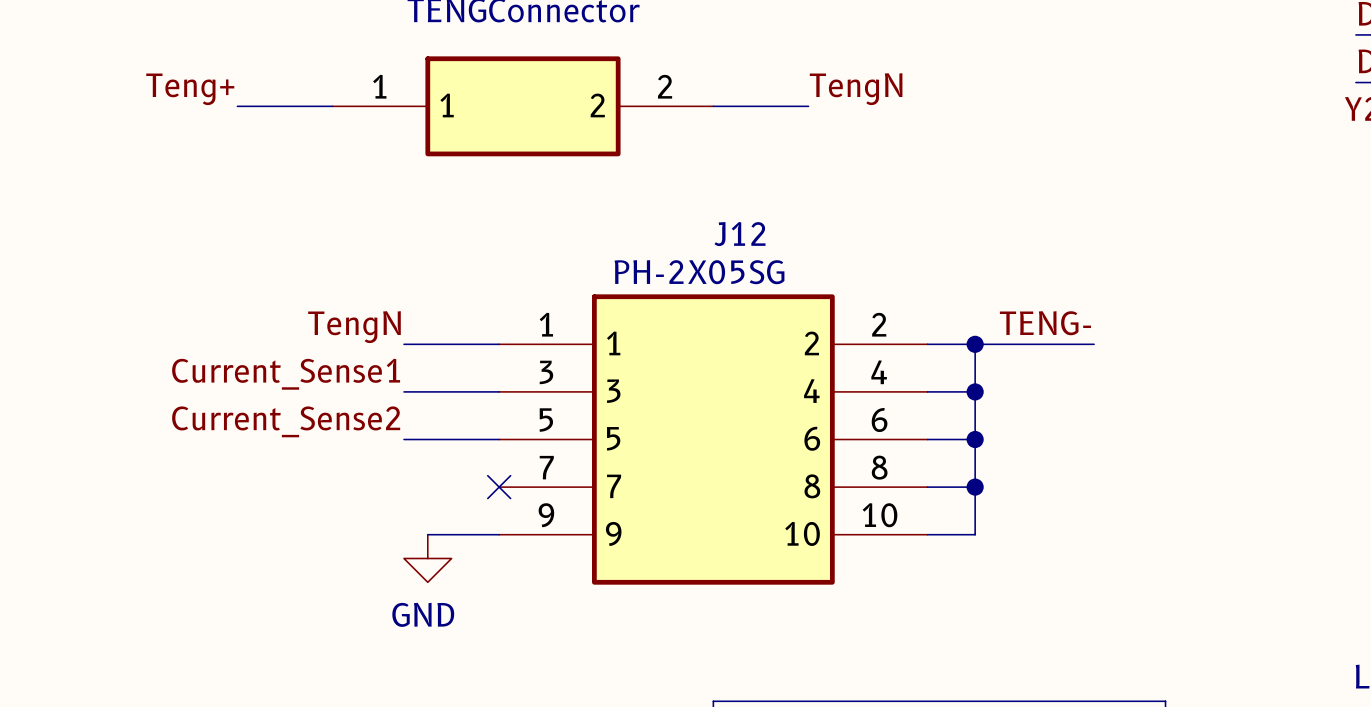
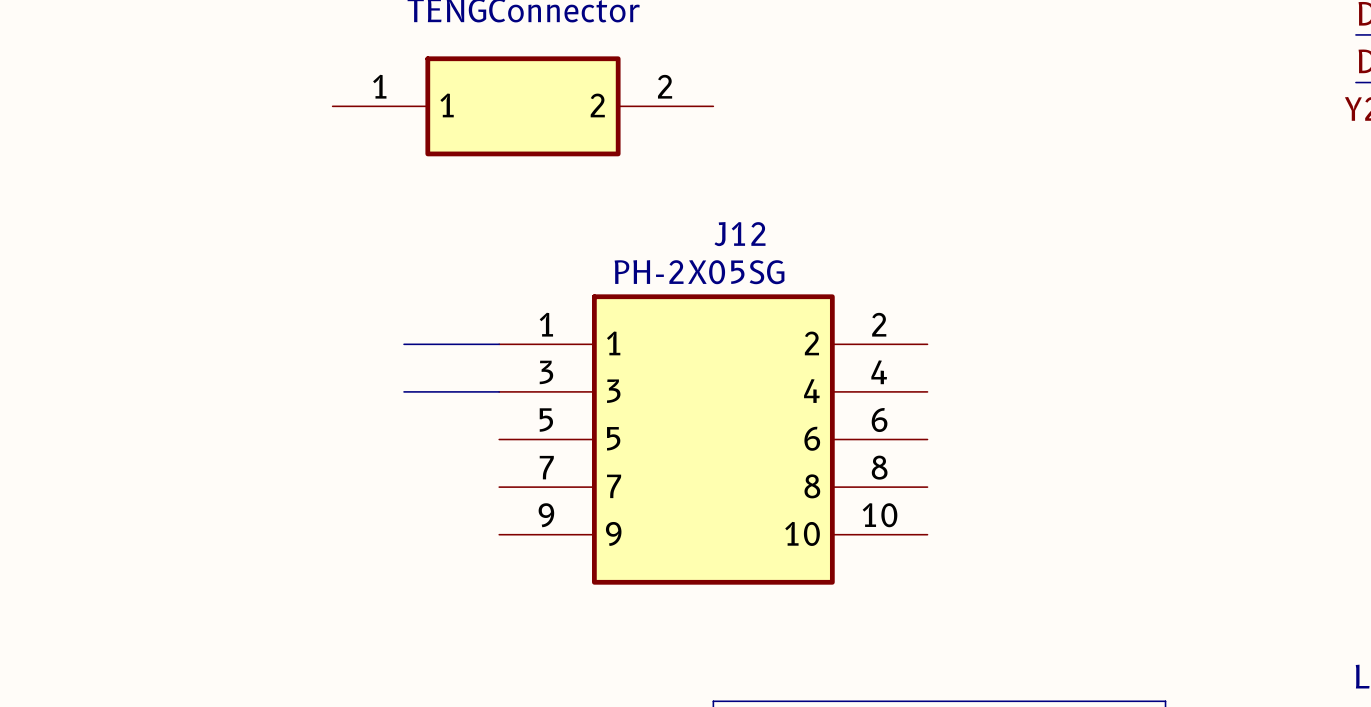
label: Teng+ (190, 89) -> none
label: TengN (856, 89) -> none
wire: (237, 106) (332, 106) -> none
wire: (713, 106) (808, 106) -> none
label: TENG- (1045, 323) -> none
label: TengN (354, 327) -> none
wire: (927, 344) (1094, 344) -> none
wire: (975, 344) (975, 534) (927, 534) -> none
junction: (975, 344) -> none
label: Current_Sense1 (286, 374) -> none
wire: (927, 391) (975, 391) -> none
junction: (975, 391) -> none
label: Current_Sense2 (286, 421) -> none
wire: (403, 439) (499, 439) -> none
wire: (927, 439) (975, 439) -> none
junction: (975, 439) -> none
no-connect mark: (499, 487) -> none
wire: (927, 487) (975, 487) -> none
junction: (975, 487) -> none
wire: (427, 534) (499, 534) -> none
power symbol: GND (427, 558) -> none

